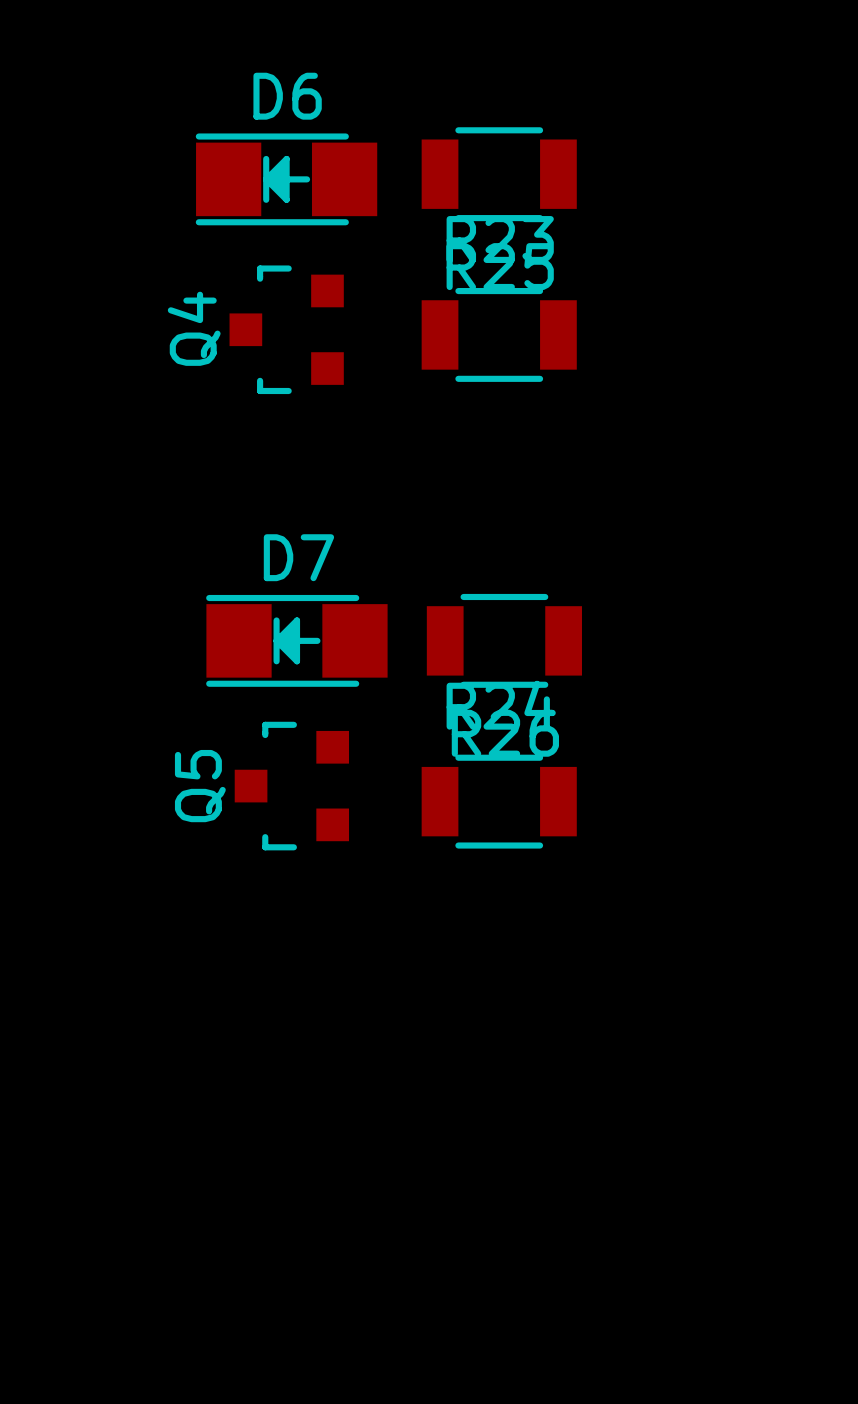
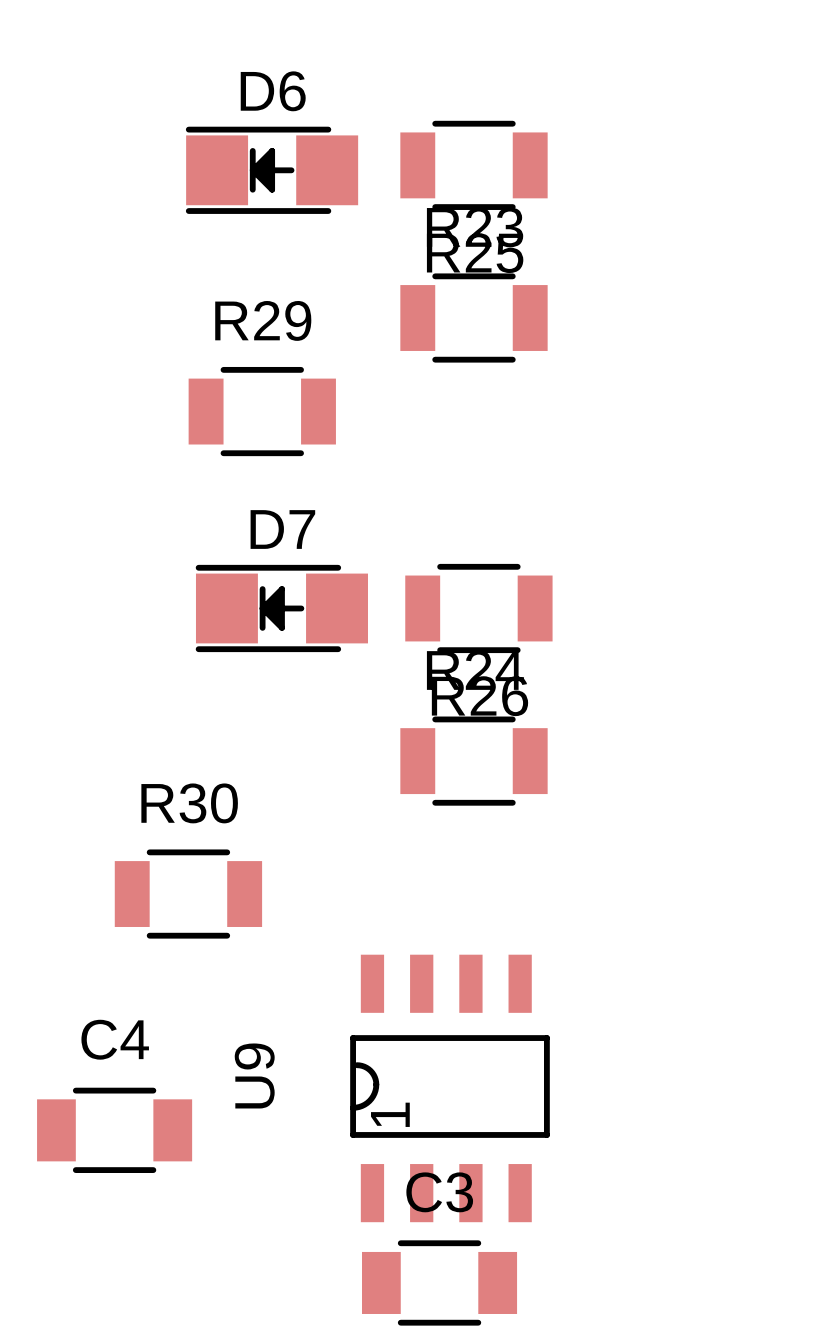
Q4: (286, 329) -> none
R29: none -> (262, 411)
Q5: (291, 786) -> none
R30: none -> (188, 894)
U9: none -> (449, 1088)
C4: none -> (114, 1130)
C3: none -> (439, 1282)

